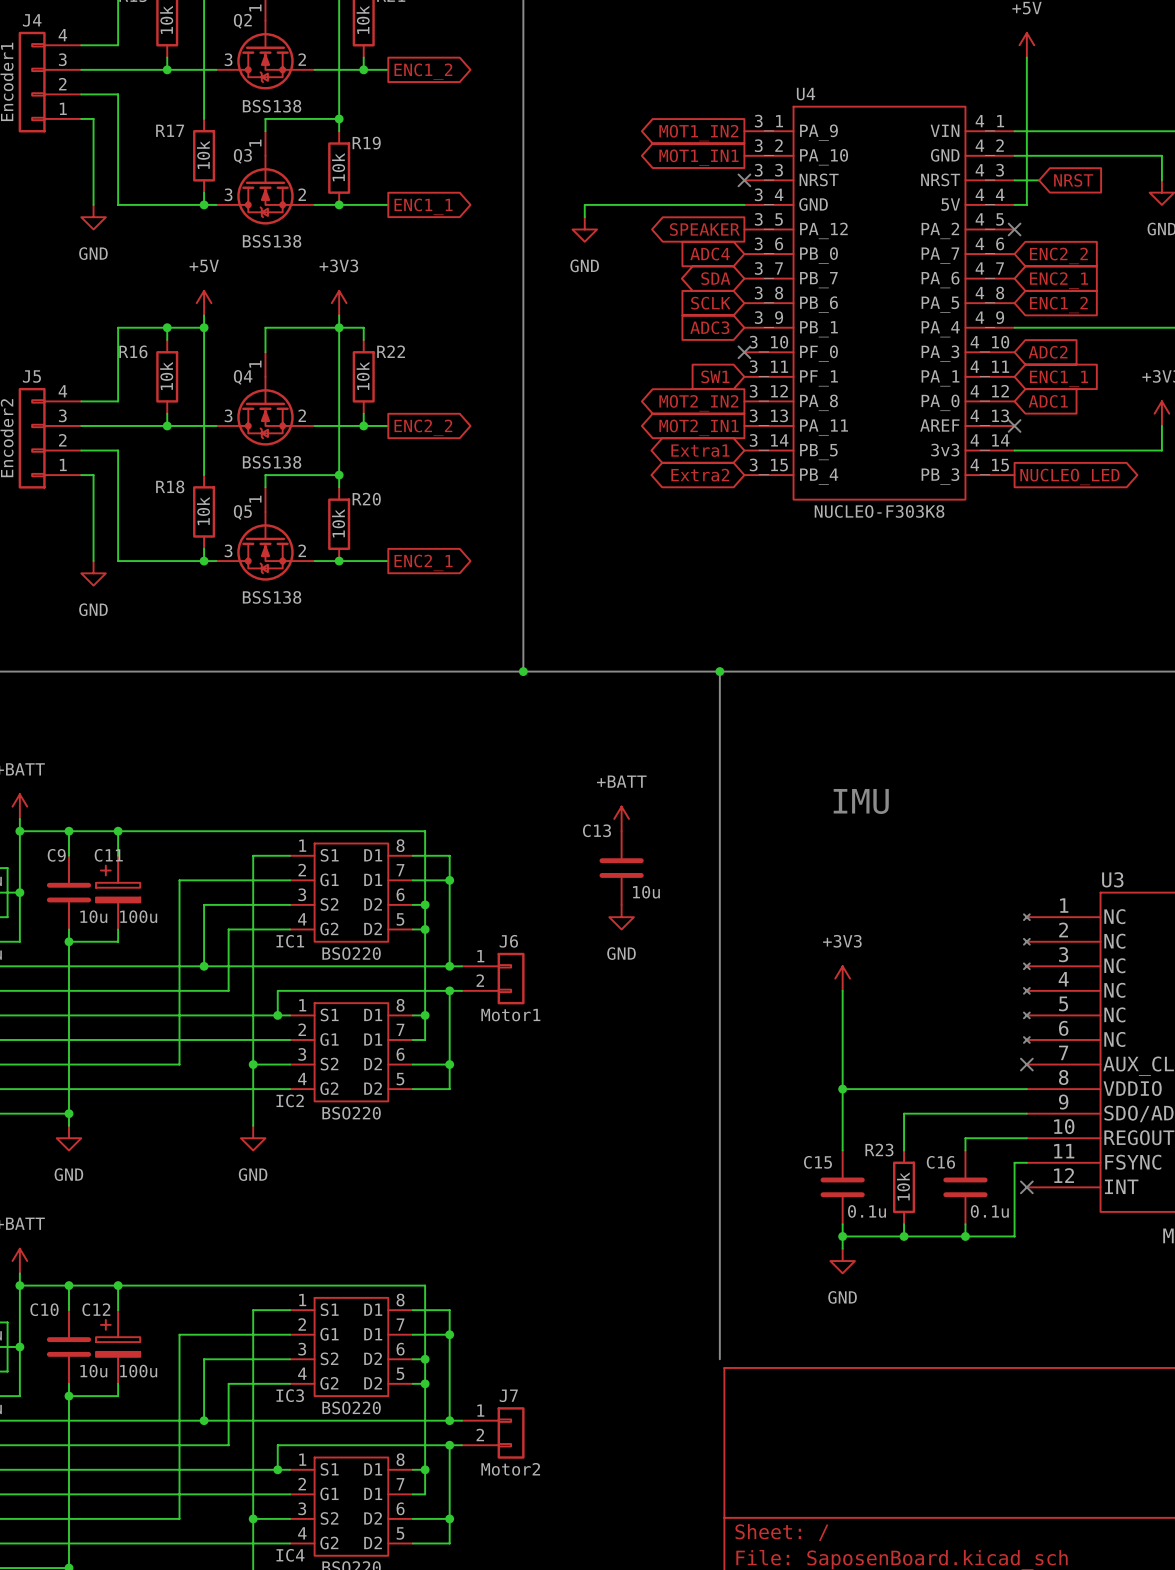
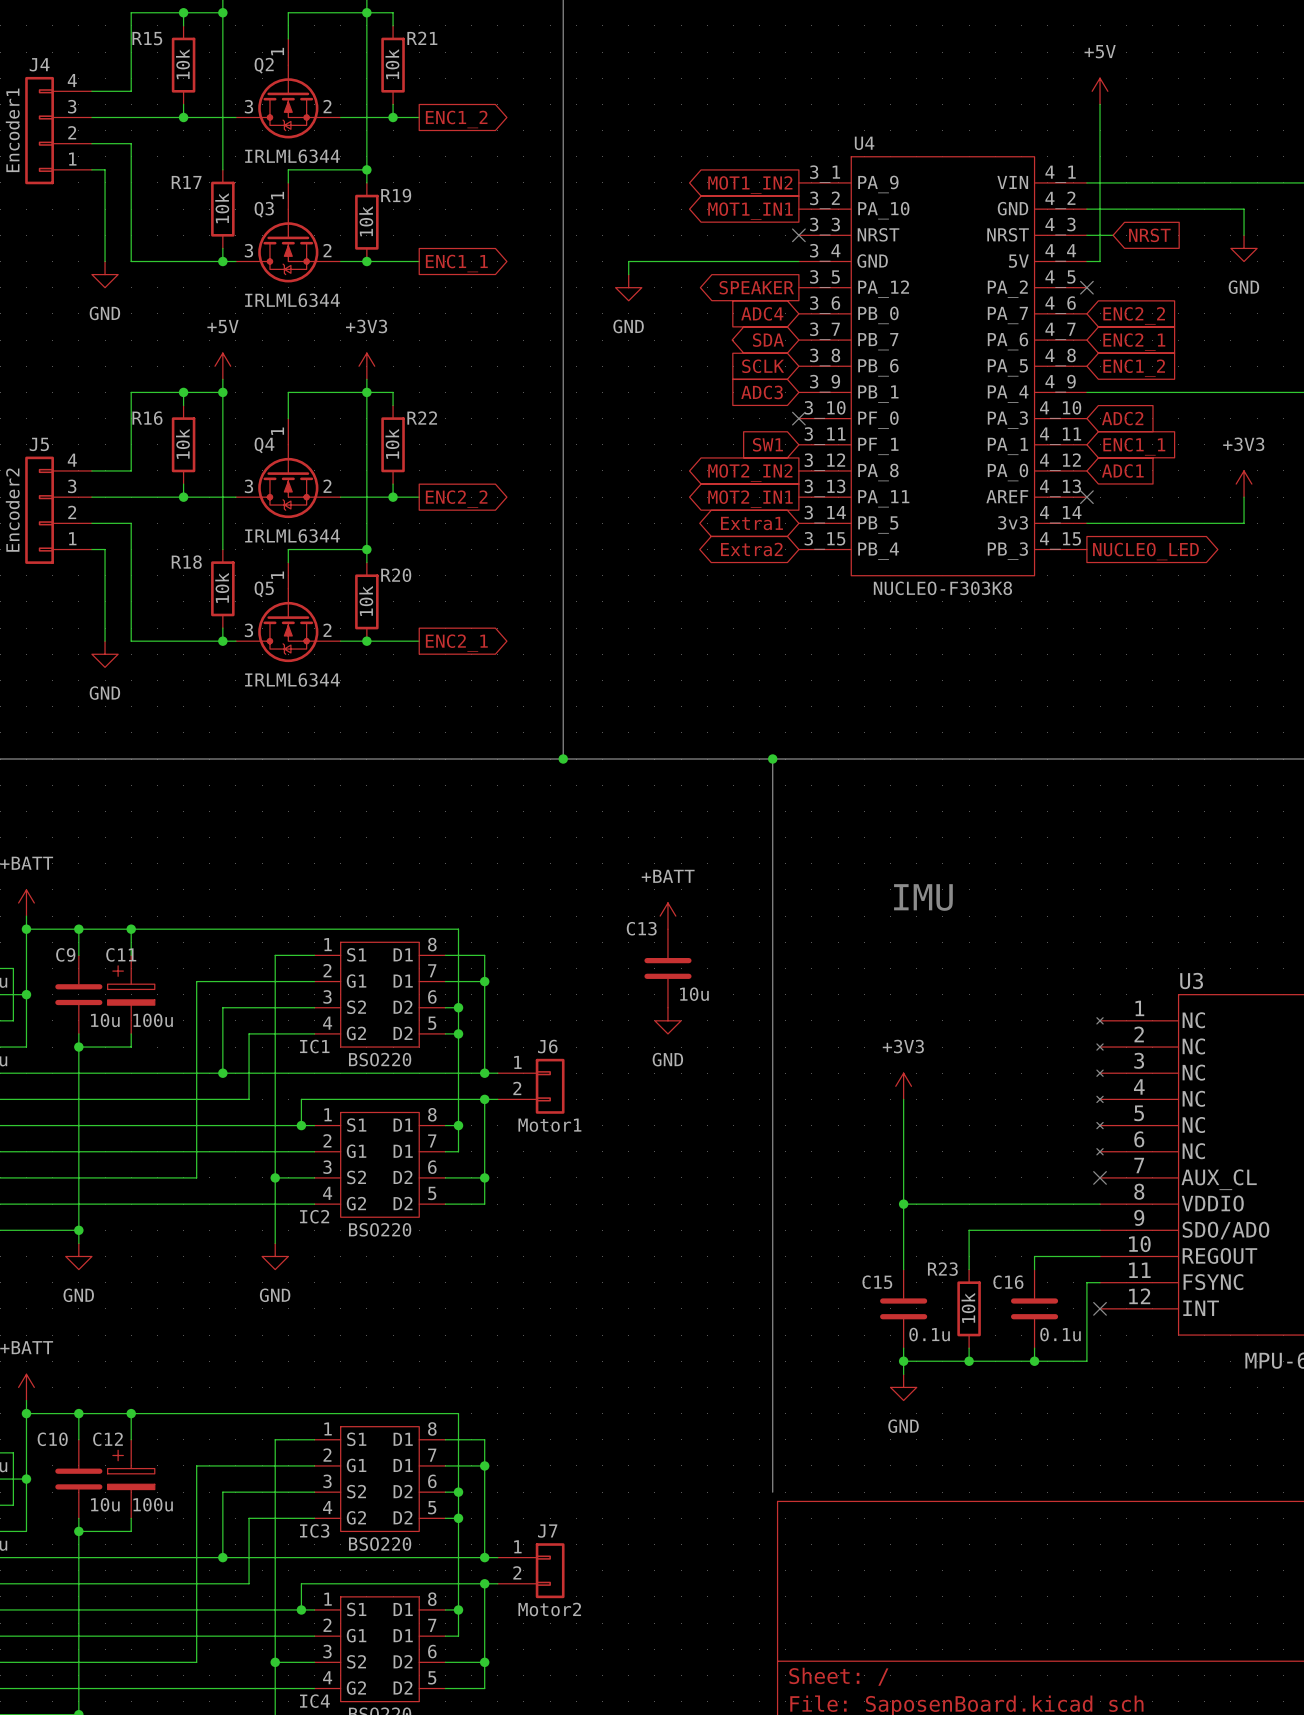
Q2 value: BSS138 (272, 106) -> IRLML6344 (292, 156)
Q3 value: BSS138 (272, 241) -> IRLML6344 (292, 300)
Q4 value: BSS138 (272, 462) -> IRLML6344 (292, 535)
Q5 value: BSS138 (272, 597) -> IRLML6344 (292, 679)

